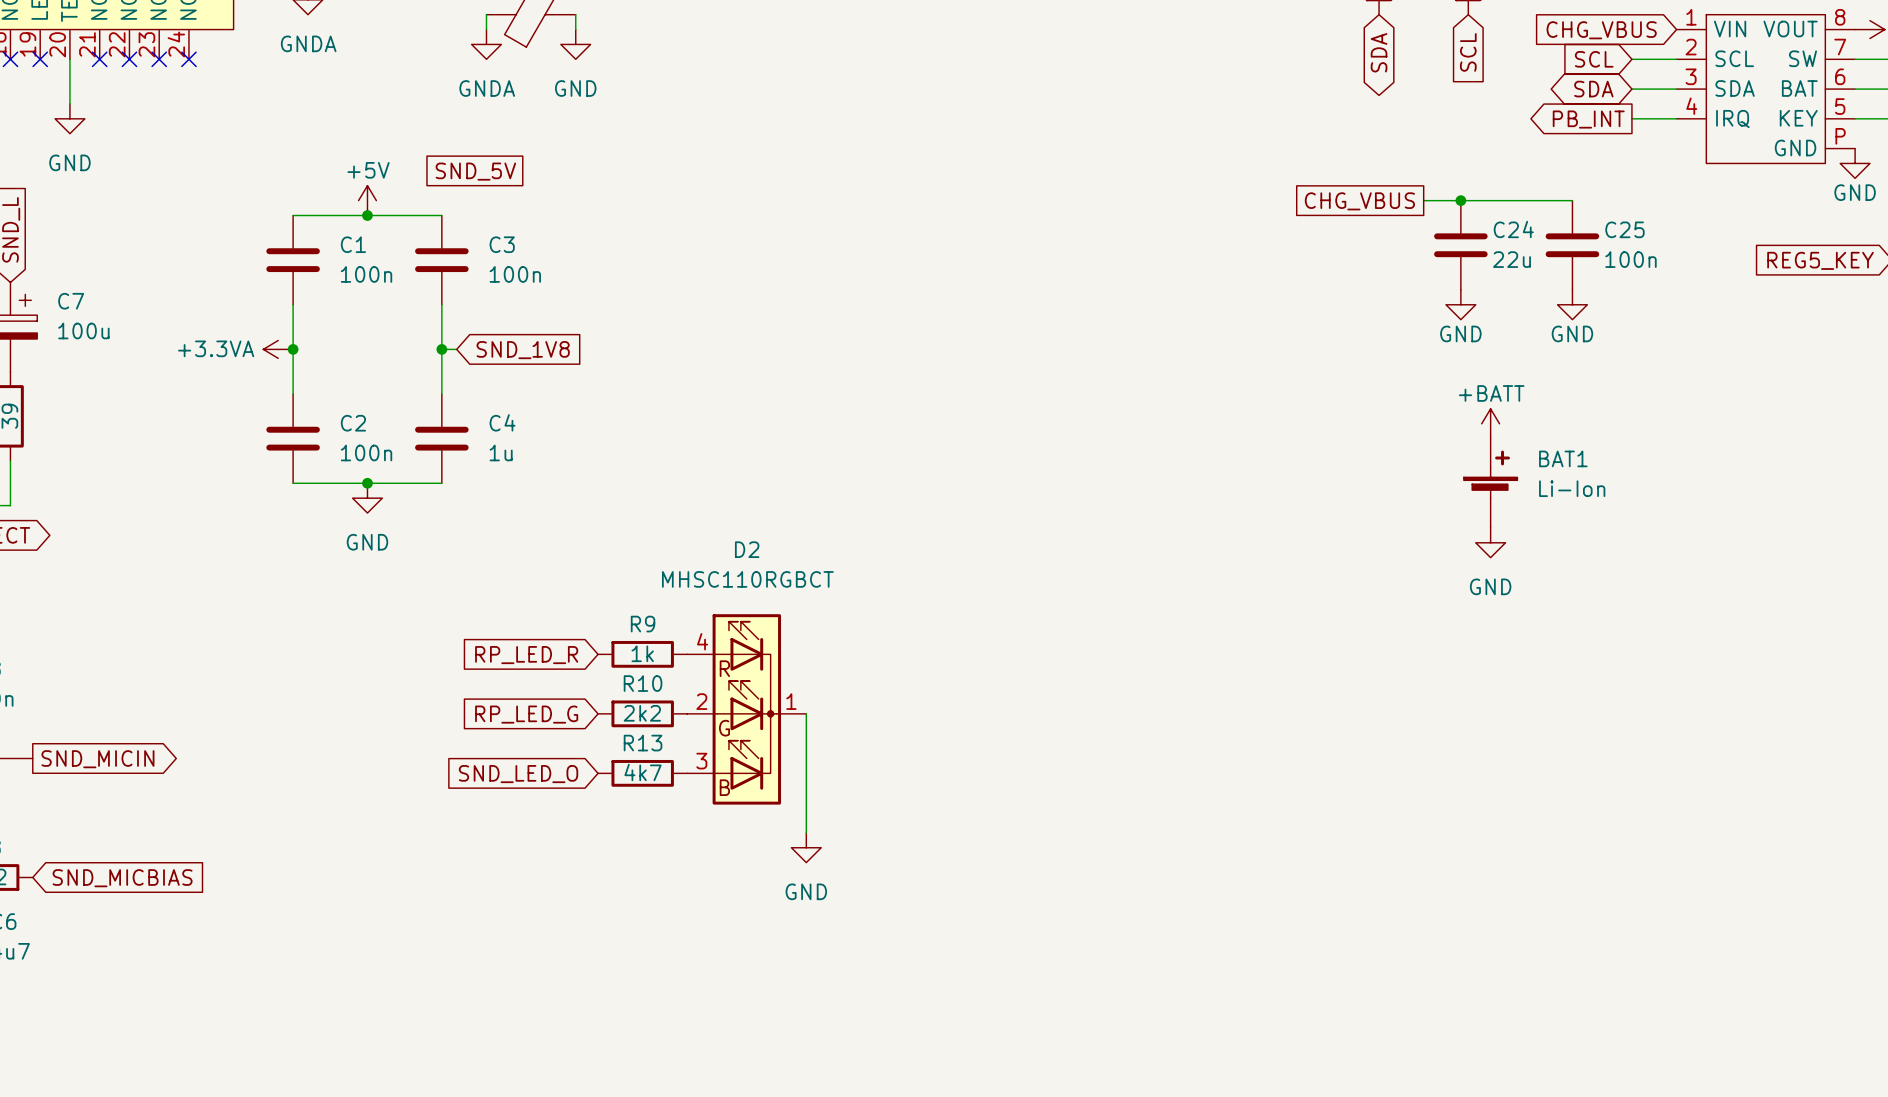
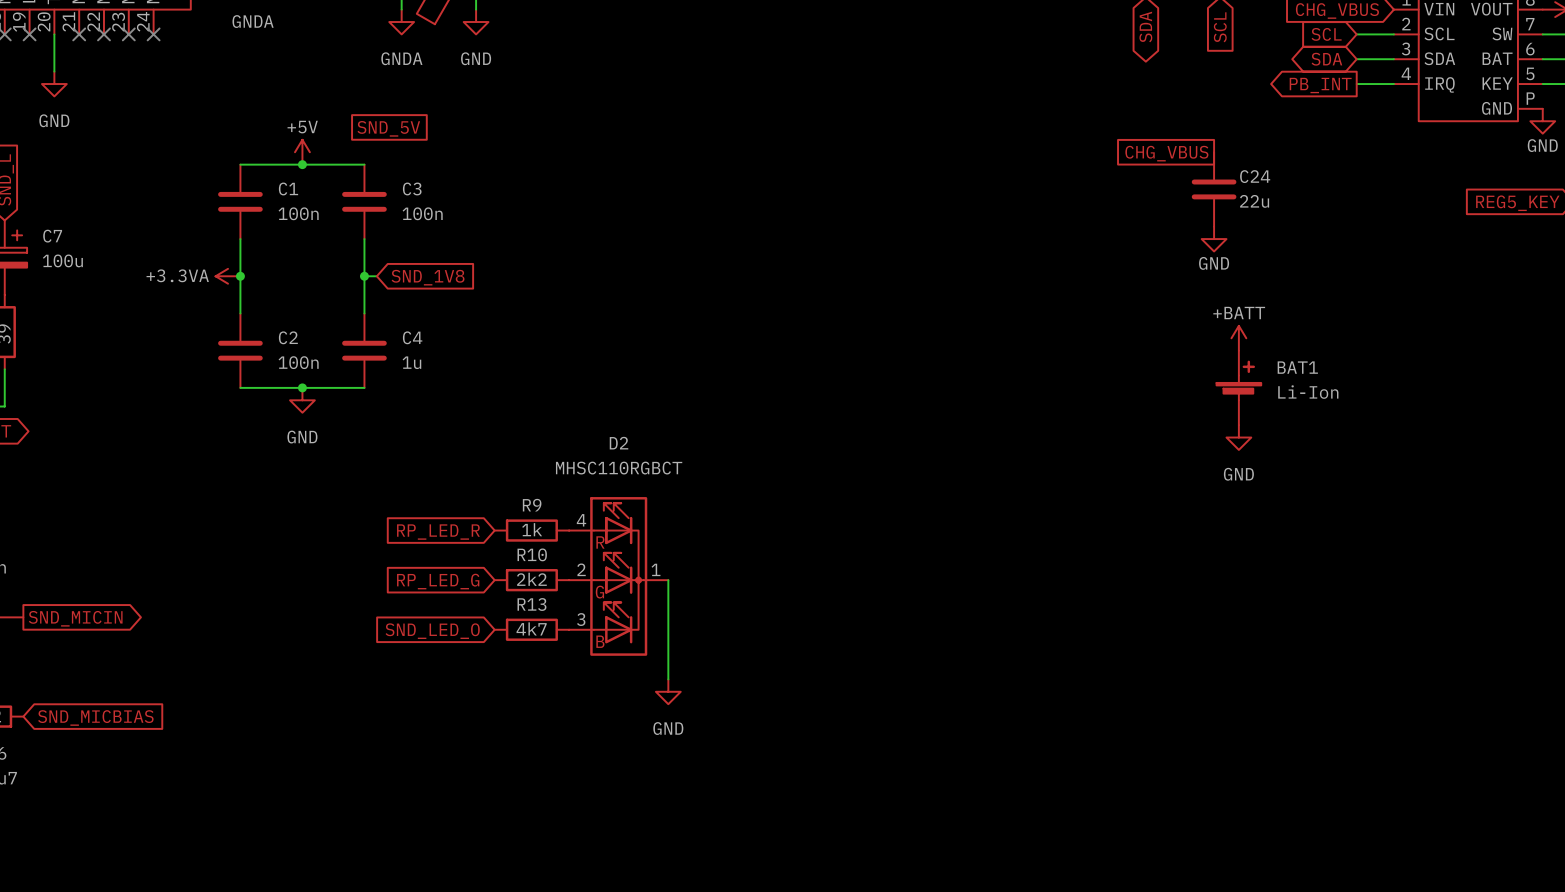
wire: (1423, 200) (1572, 200) -> none
junction: (1460, 200) -> none
global label position: CHG_VBUS (1359, 201) -> CHG_VBUS (1166, 153)
C25: 100n (1572, 245) -> none
power symbol: GND (1572, 304) -> none

